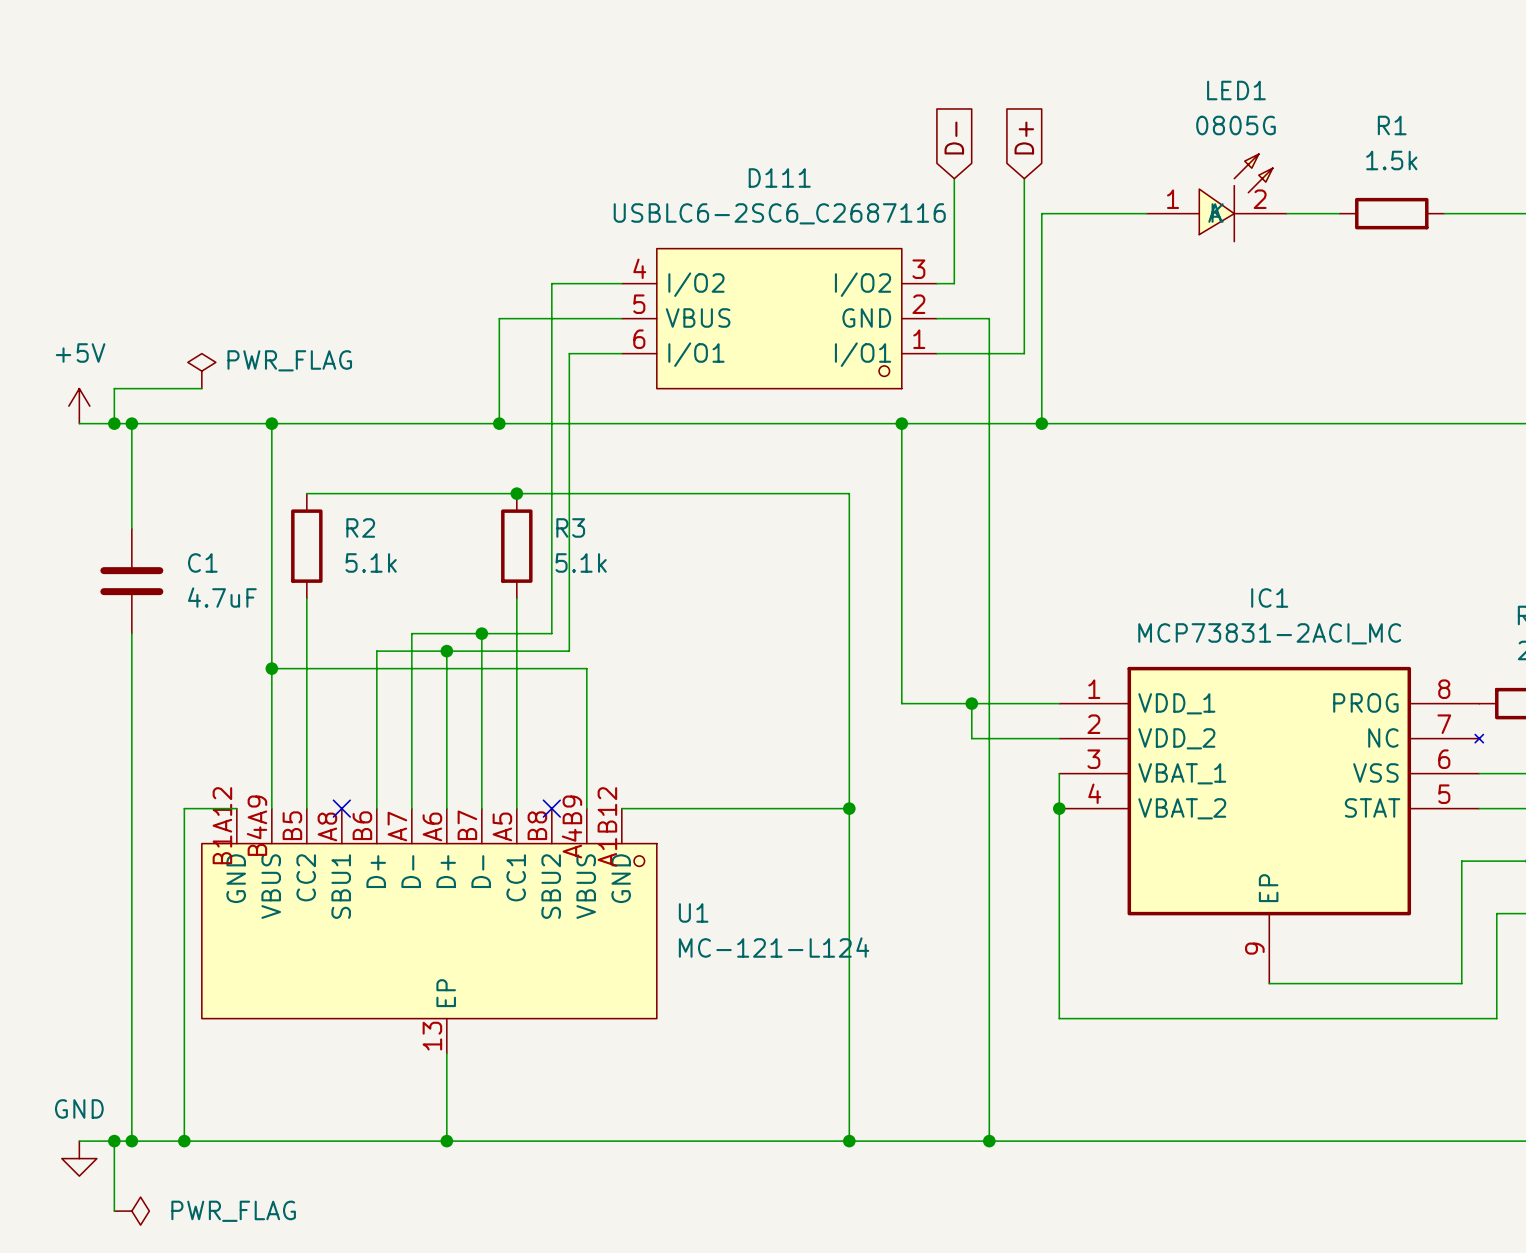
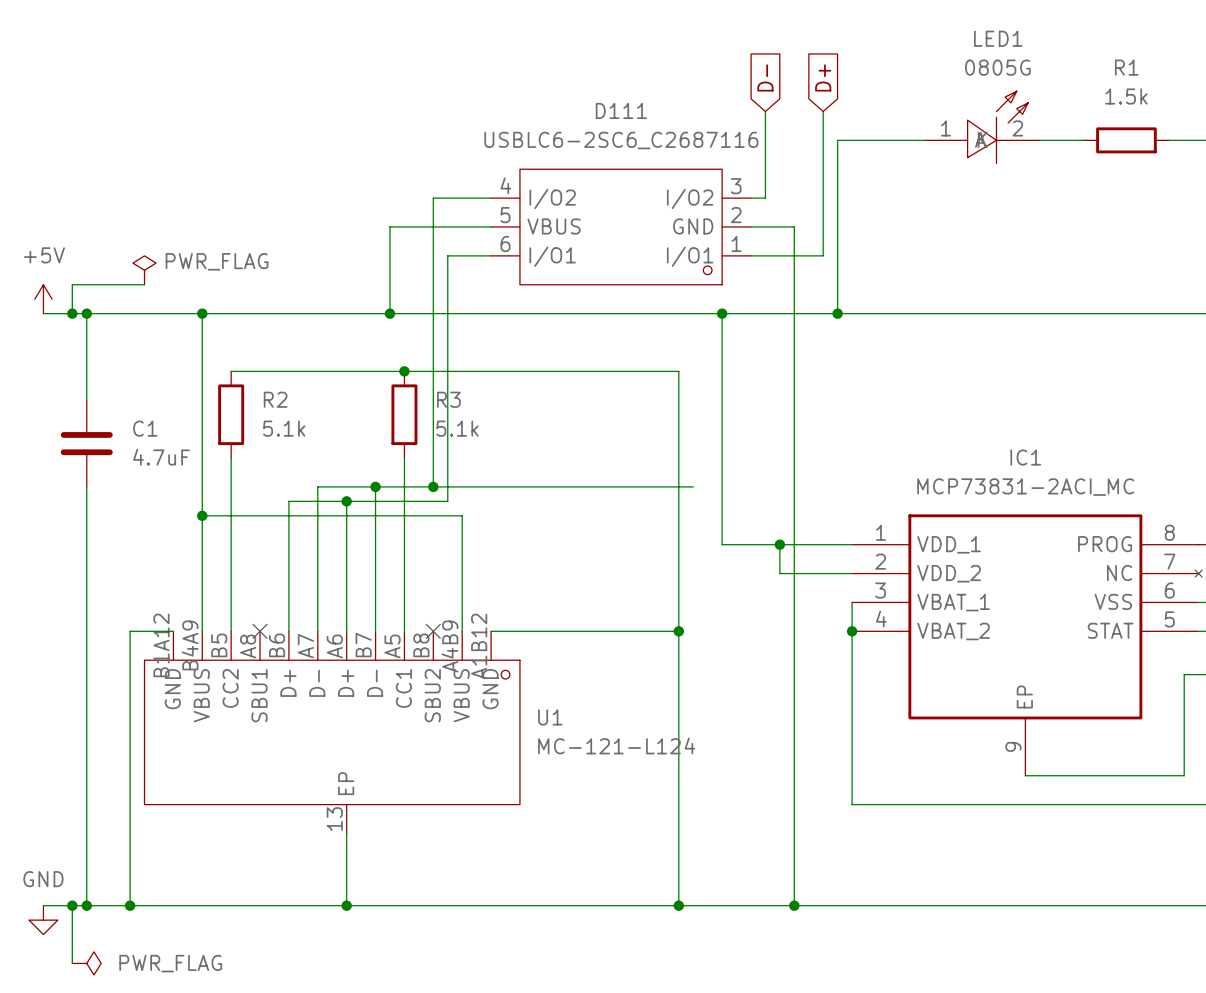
wire: none -> (433, 486) (693, 486)
junction: none -> (433, 486)

